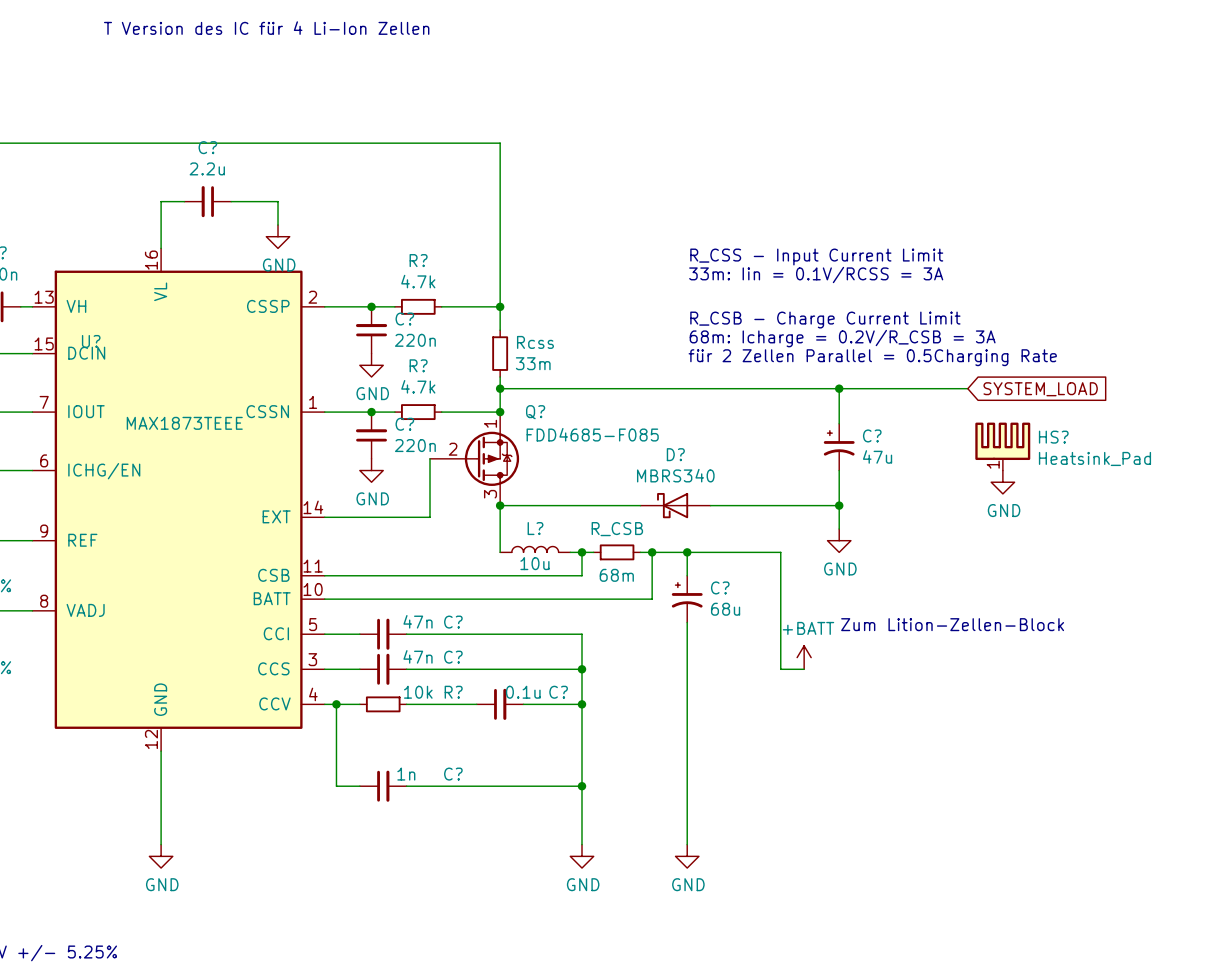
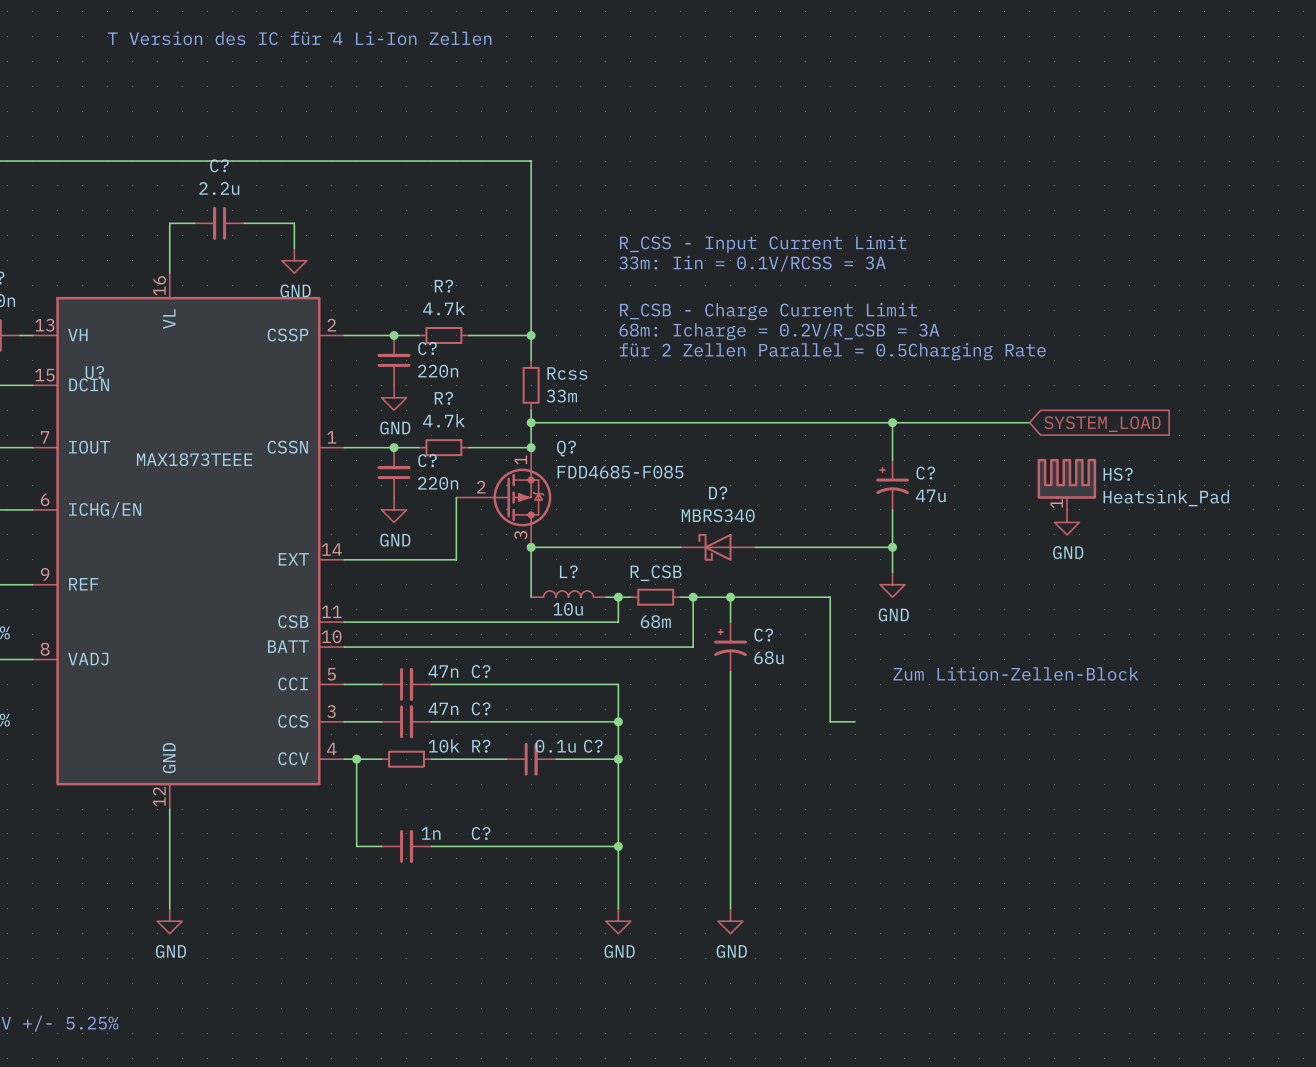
text position: R_CSS - Input Current Limit (816, 257) -> R_CSS - Input Current Limit (763, 244)
text position: 33m: Iin = 0.1V/RCSS = 3A (816, 275) -> 33m: Iin = 0.1V/RCSS = 3A (752, 263)
text position: R_CSB - Charge Current Limit (825, 320) -> R_CSB - Charge Current Limit (768, 311)
text position: 68m: Icharge = 0.2V/R_CSB = 3A (842, 338) -> 68m: Icharge = 0.2V/R_CSB = 3A (779, 331)
text position: für 2 Zellen Parallel = 0.5Charging Rate (872, 357) -> für 2 Zellen Parallel = 0.5Charging Rate (832, 351)
power symbol: +BATT (804, 657) -> none

